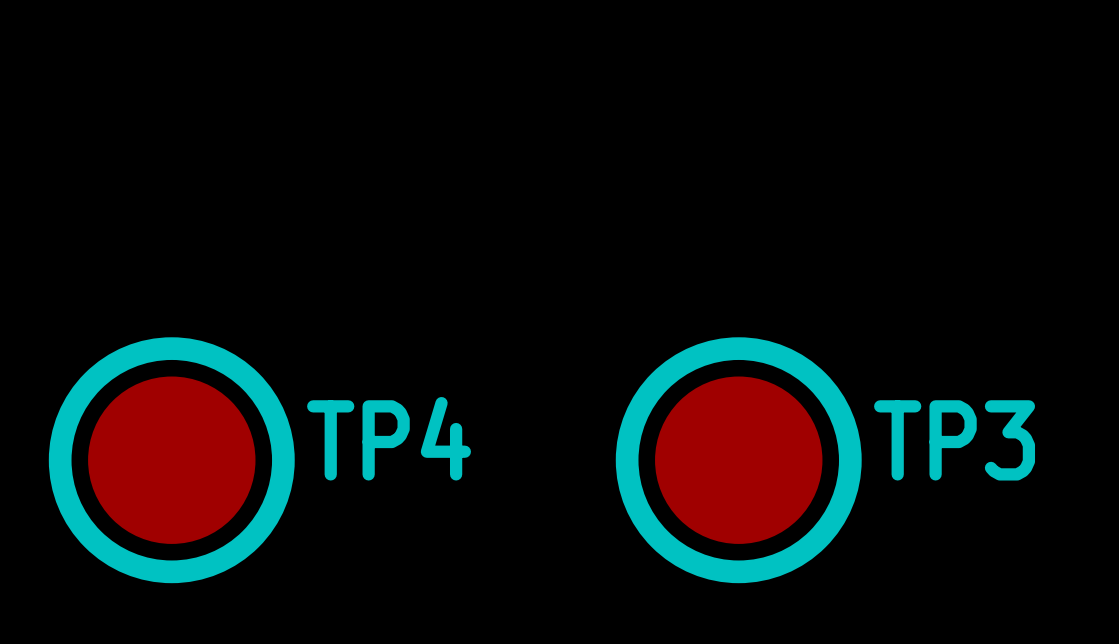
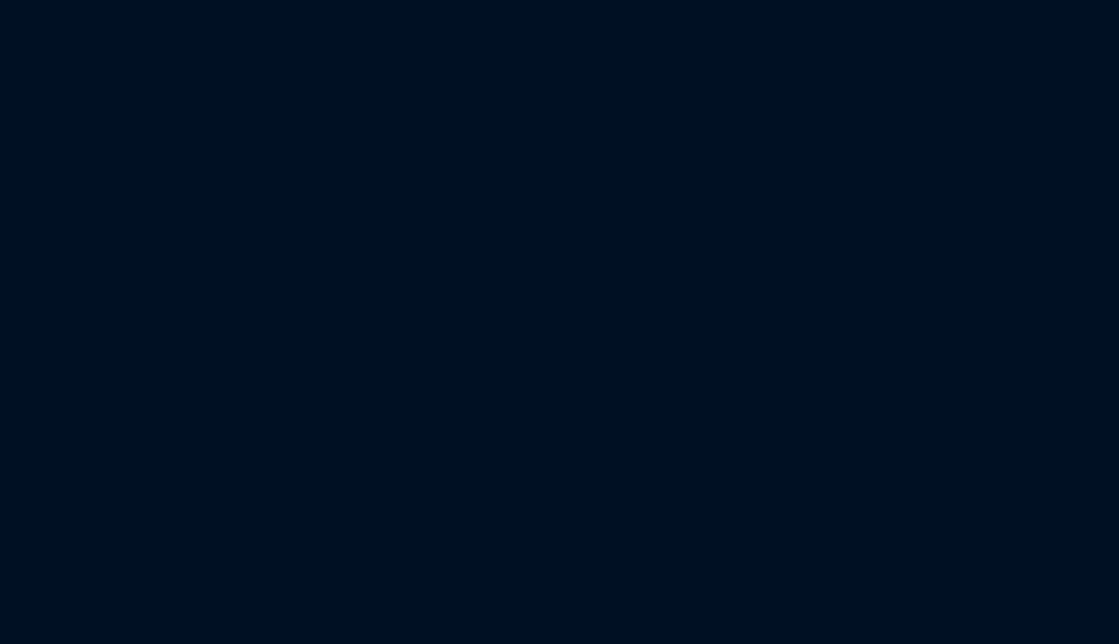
TP4: (171, 460) -> none
TP3: (738, 460) -> none

